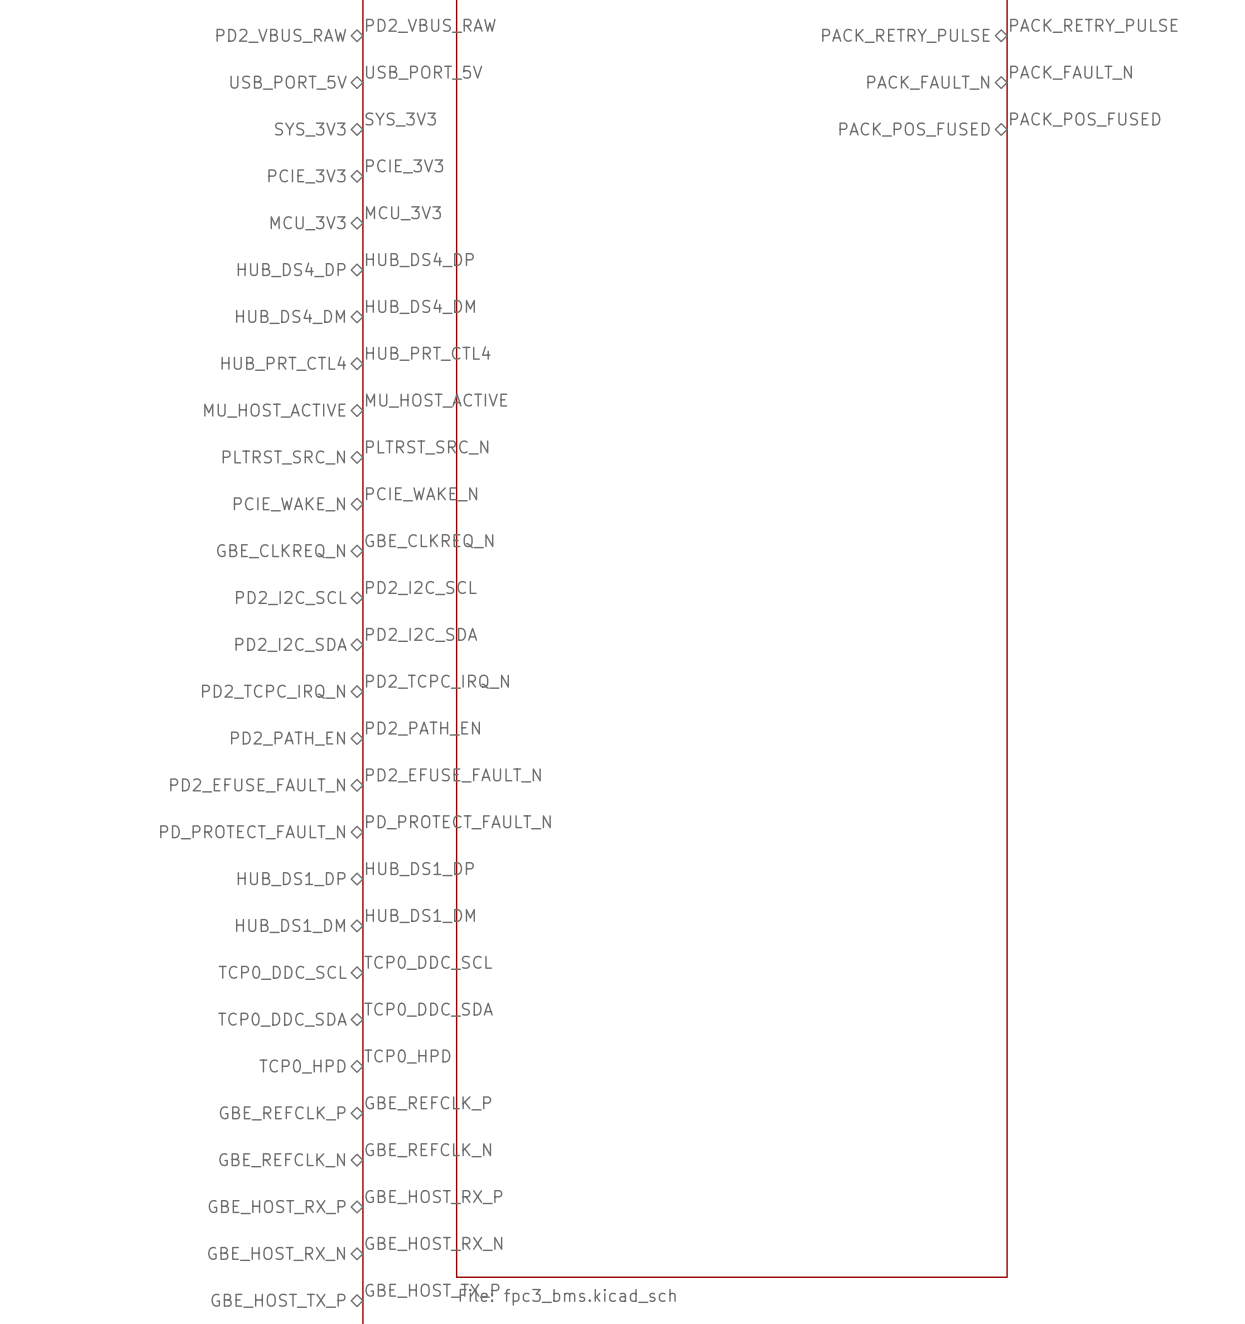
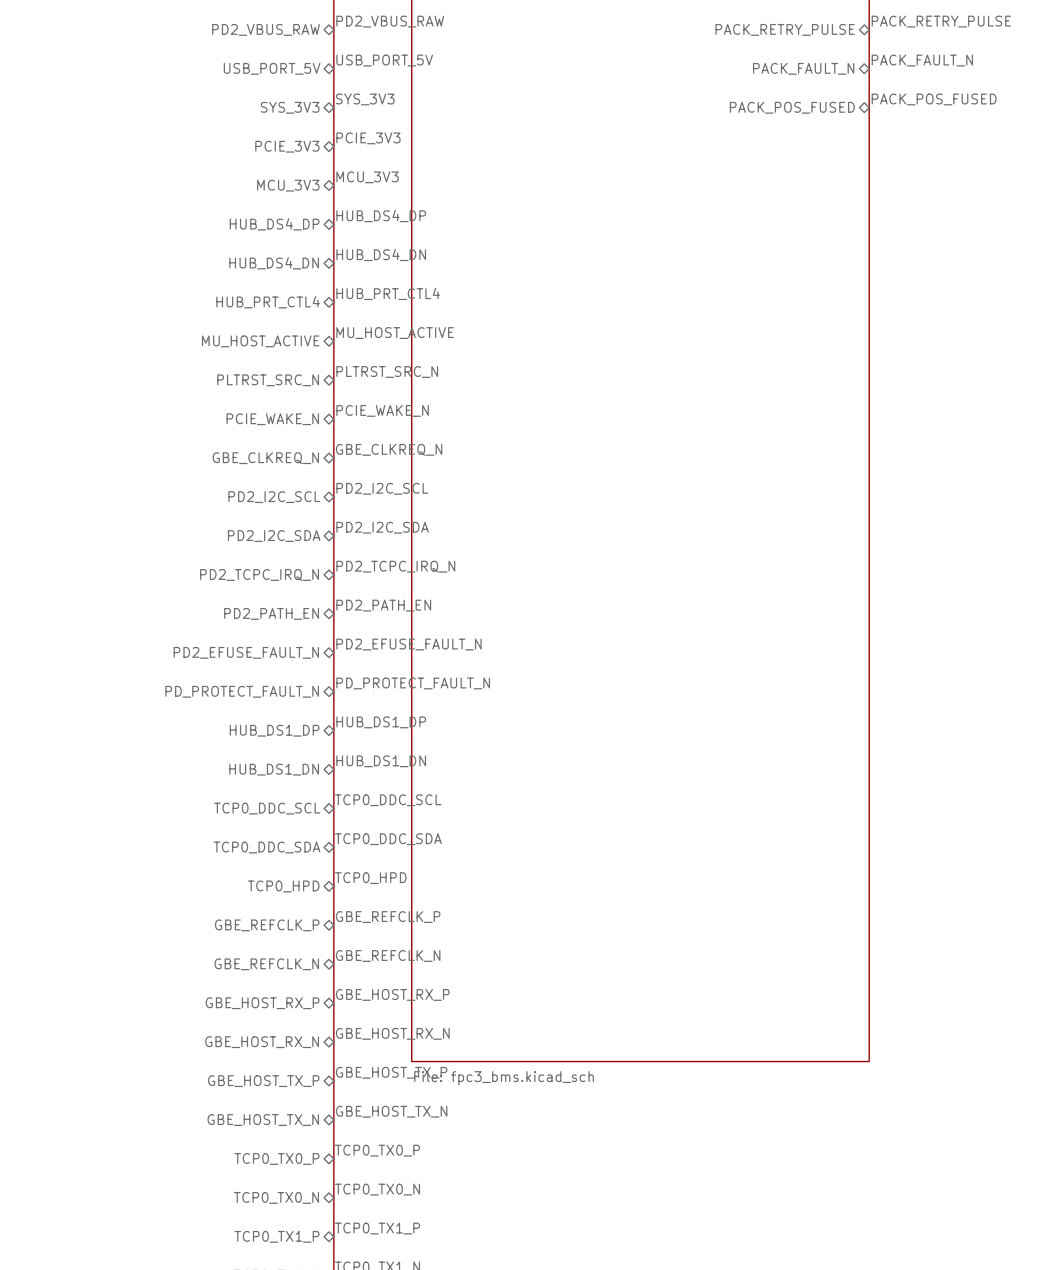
label: HUB_DS4_DM (420, 306) -> HUB_DS4_DN (381, 254)
sheet pin: HUB_DS4_DM (290, 316) -> HUB_DS4_DN (274, 263)
label: HUB_DS1_DM (420, 916) -> HUB_DS1_DN (381, 761)
sheet pin: HUB_DS1_DM (290, 926) -> HUB_DS1_DN (274, 769)

